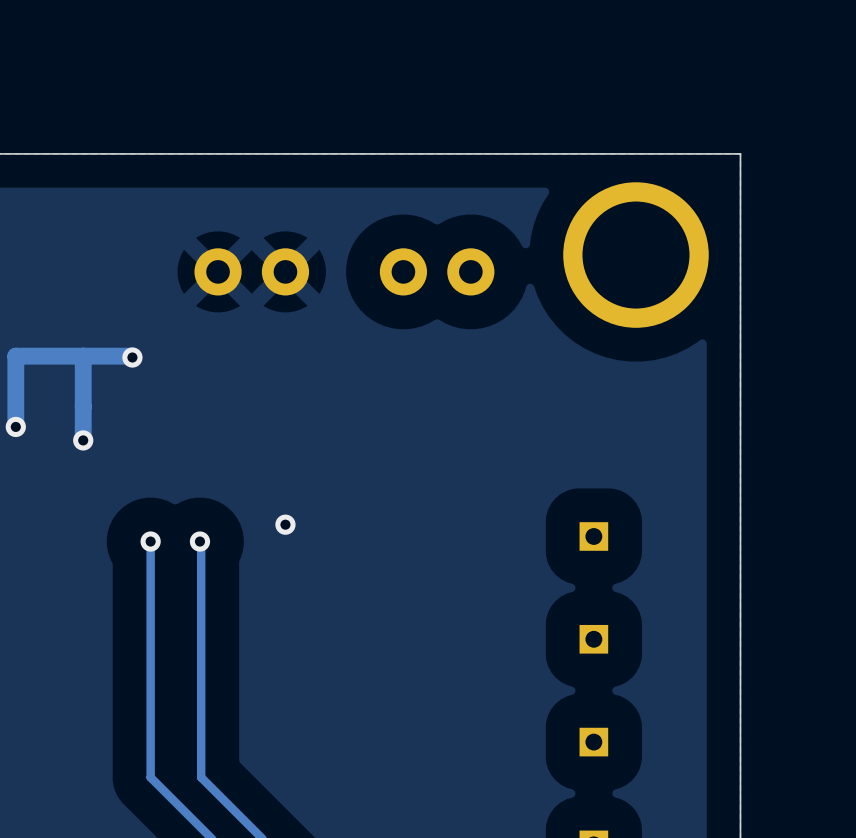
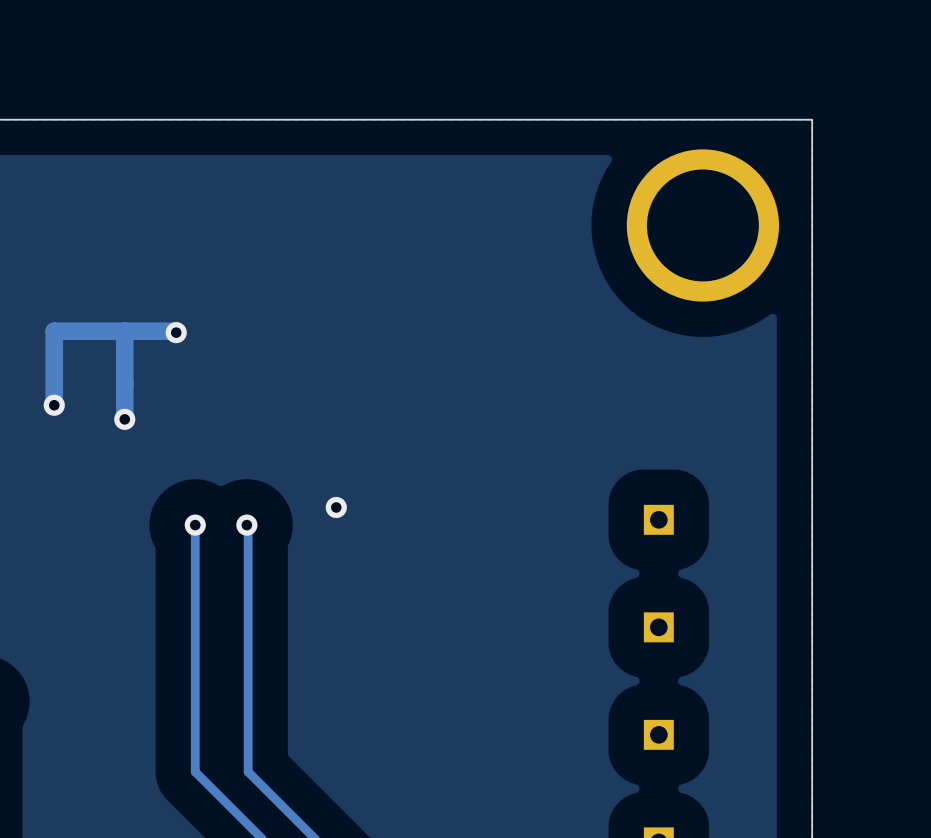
part: (251, 271) -> none
part: (437, 271) -> none

